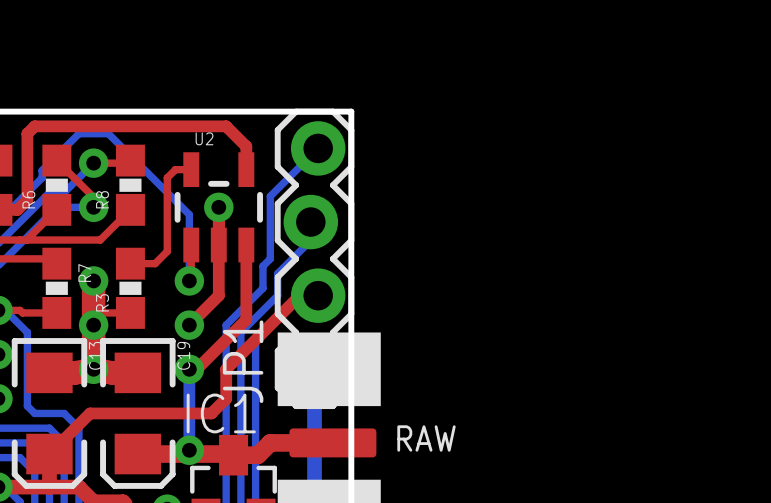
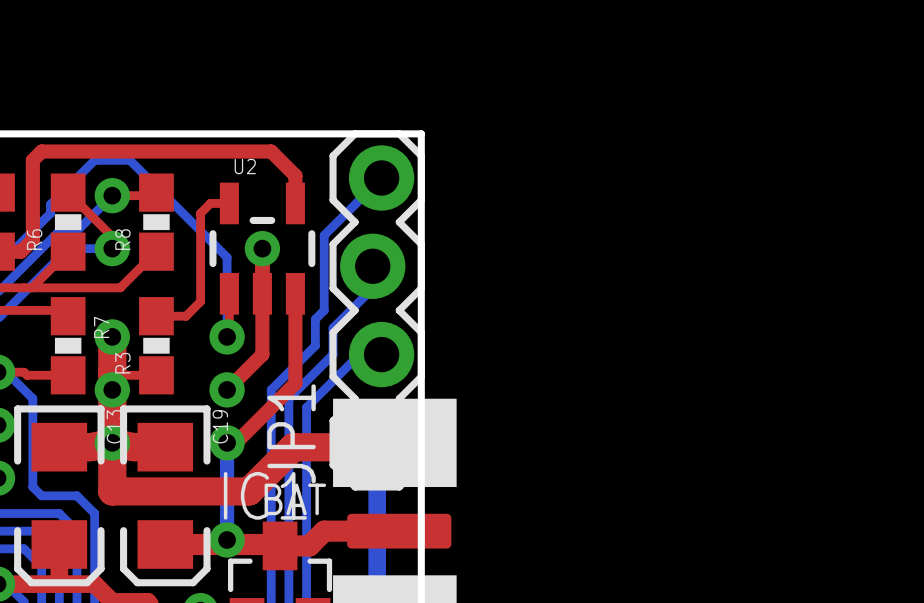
top track: (318, 295) (299, 295) (226, 369) (226, 398) (211, 413) (90, 413) (49, 454) -> none
top track: none -> (112, 442) (112, 491) (249, 491) (293, 447) (377, 447)
text: none -> BAT (295, 499)
text: RAW (426, 438) -> none

